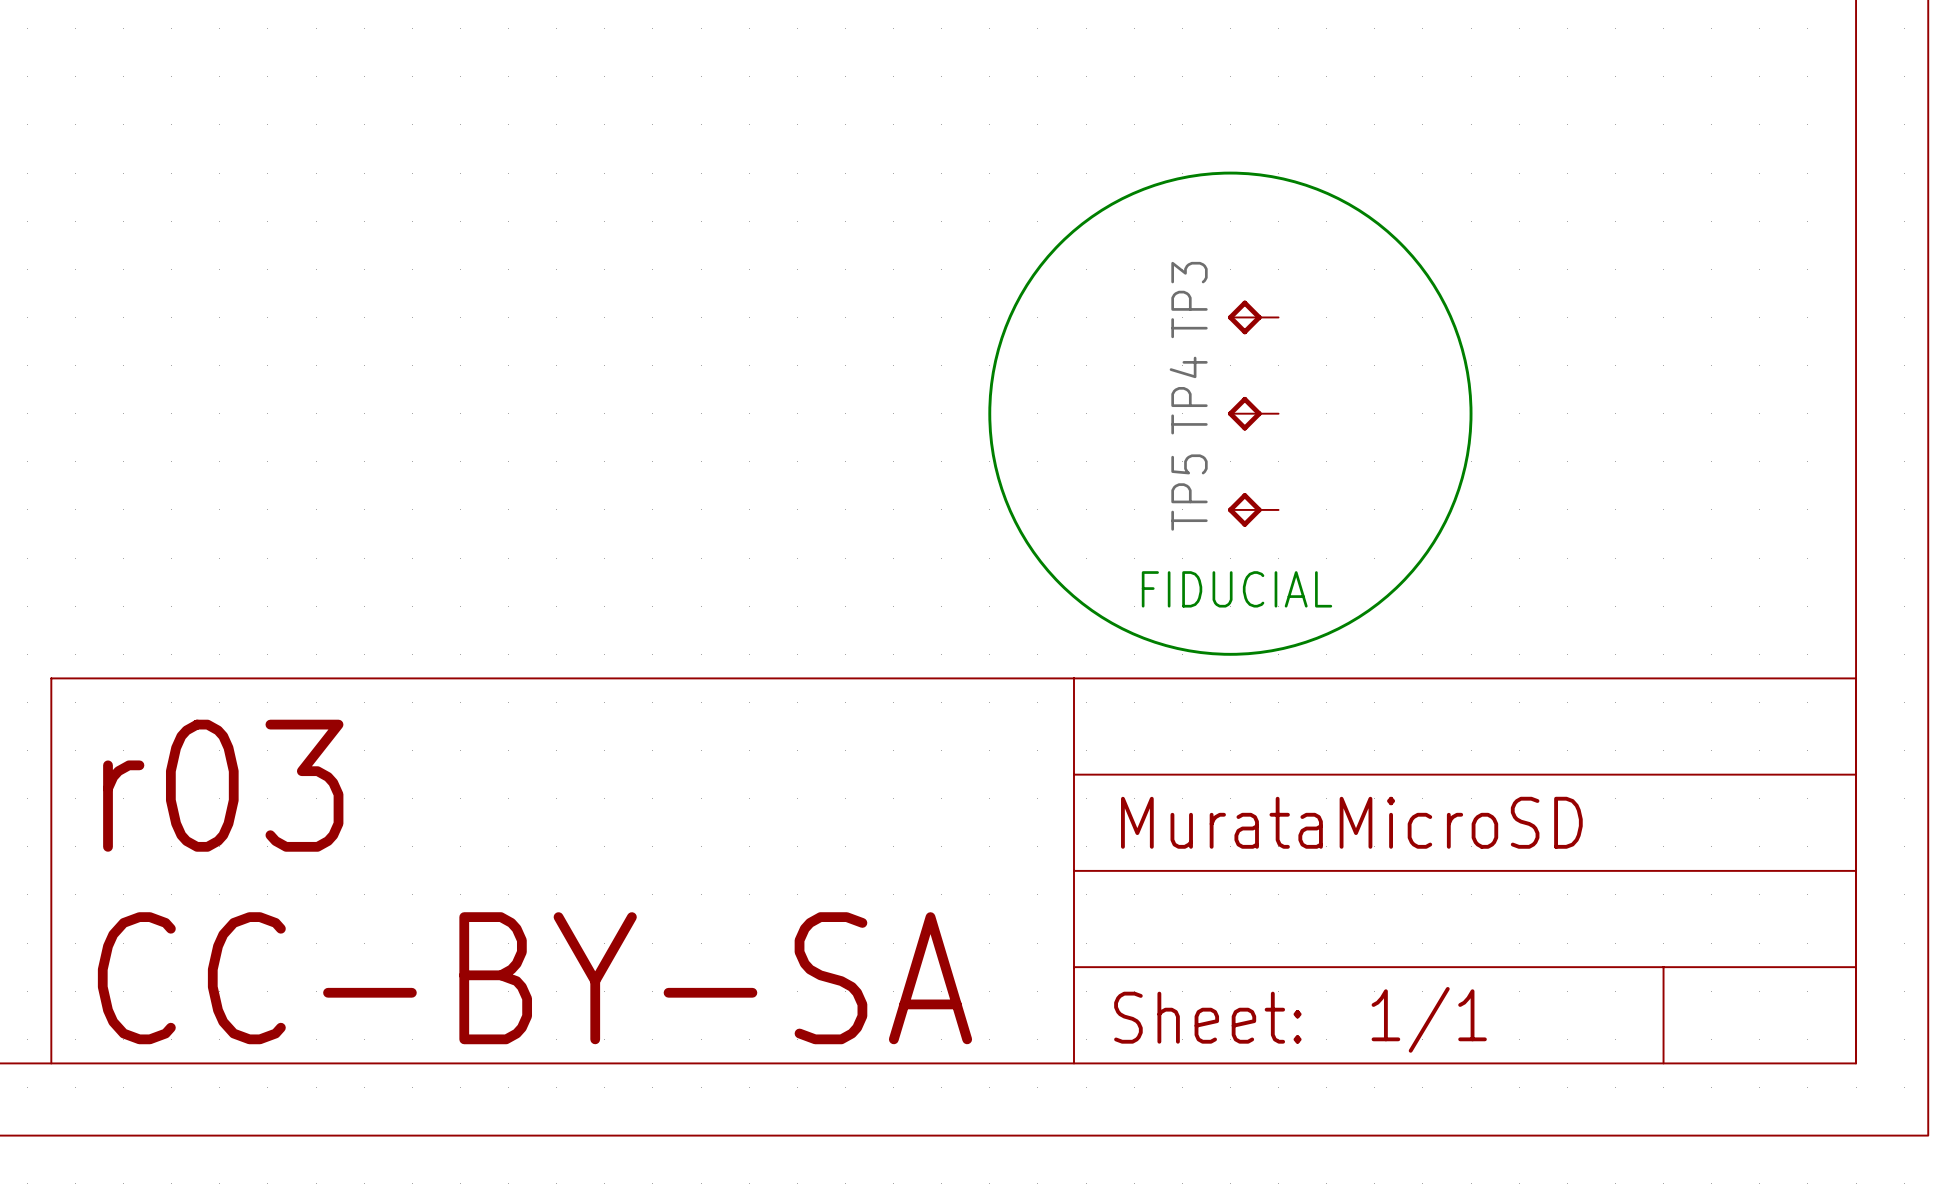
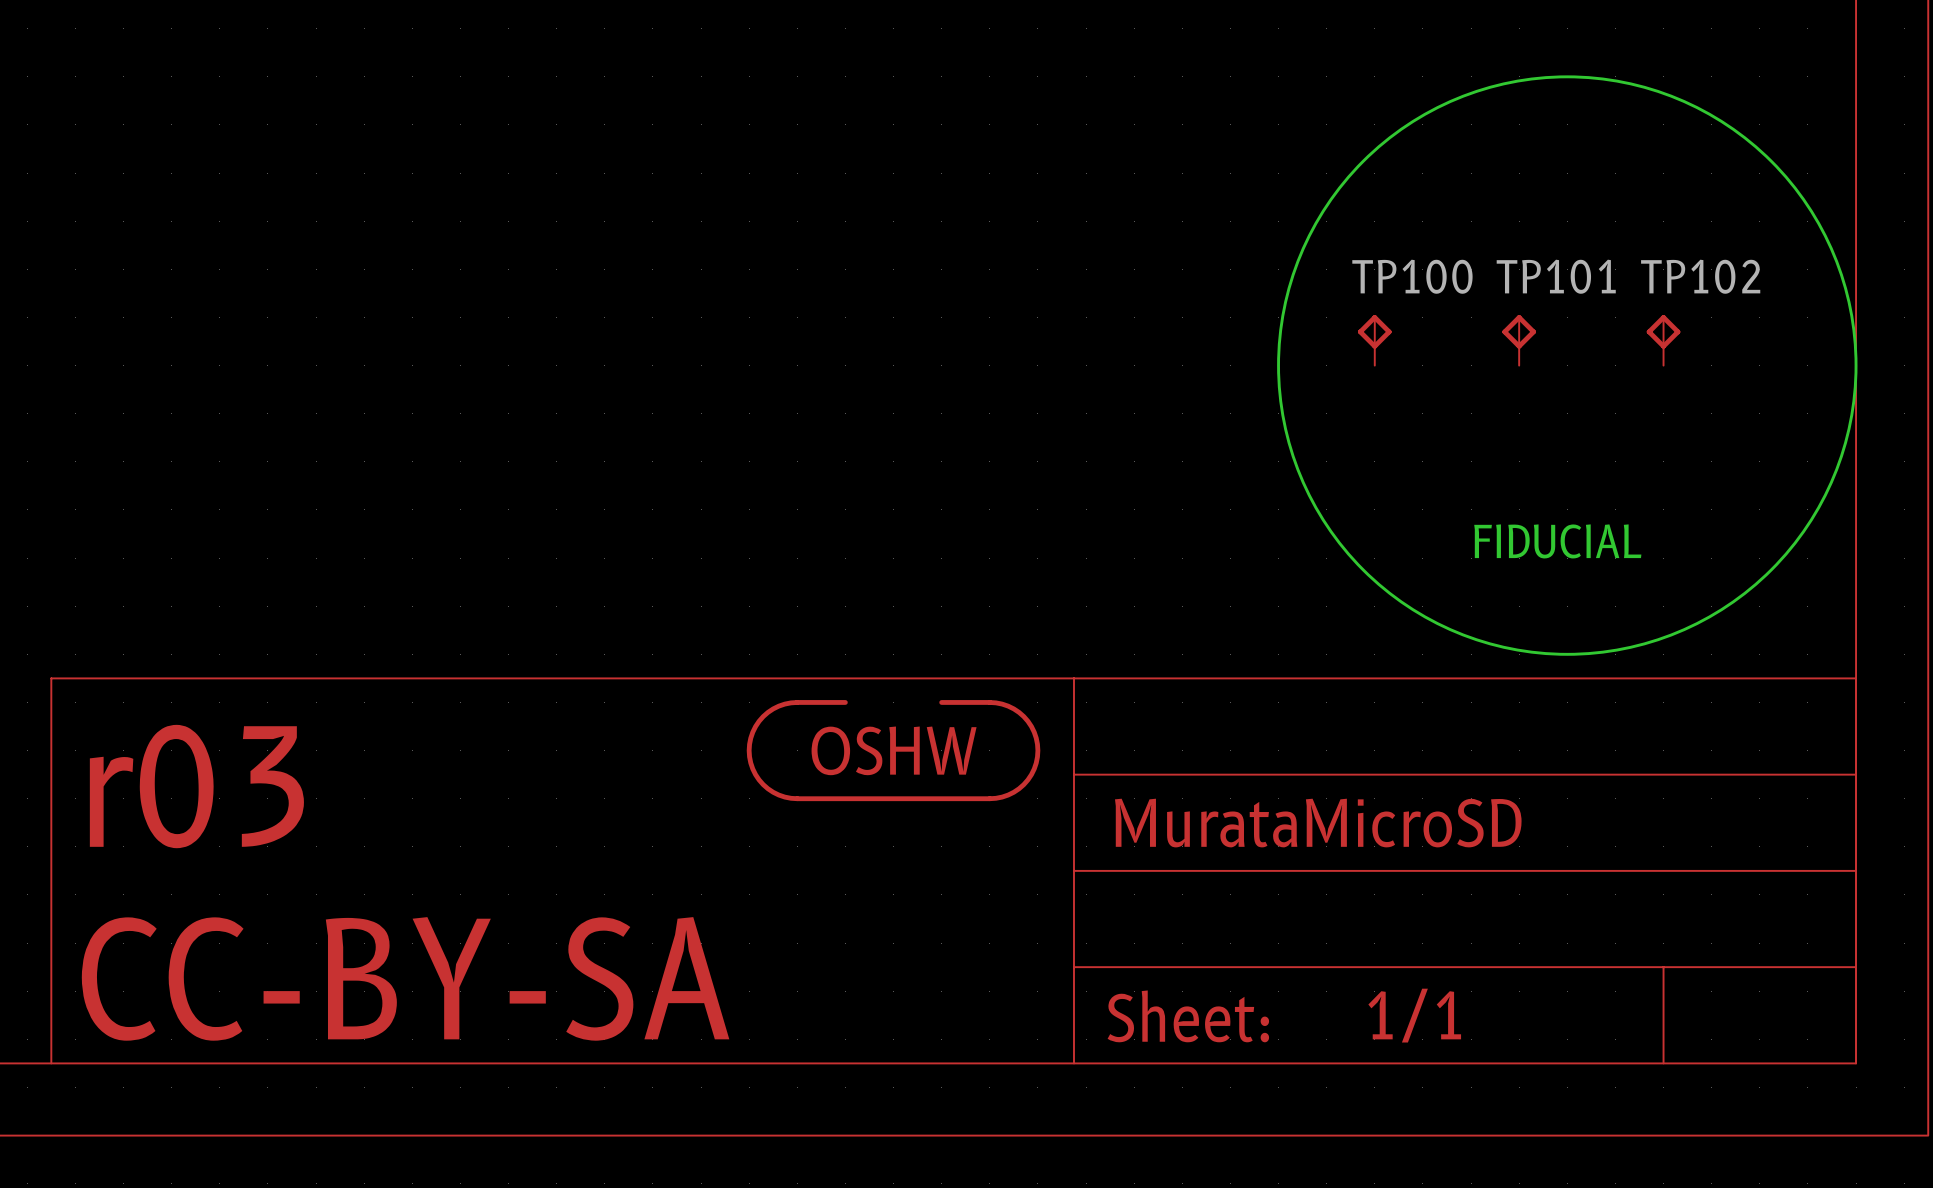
drawing: none -> [1277, 75, 1858, 656]
drawing: [988, 171, 1473, 656] -> none
TP3: (1253, 317) -> none
TP100: none -> (1374, 340)
TP101: none -> (1519, 340)
TP102: none -> (1663, 340)
TP4: (1253, 413) -> none
TP5: (1253, 509) -> none
text position: FIDUCIAL (1236, 589) -> FIDUCIAL (1557, 541)
part: none -> (893, 750)

